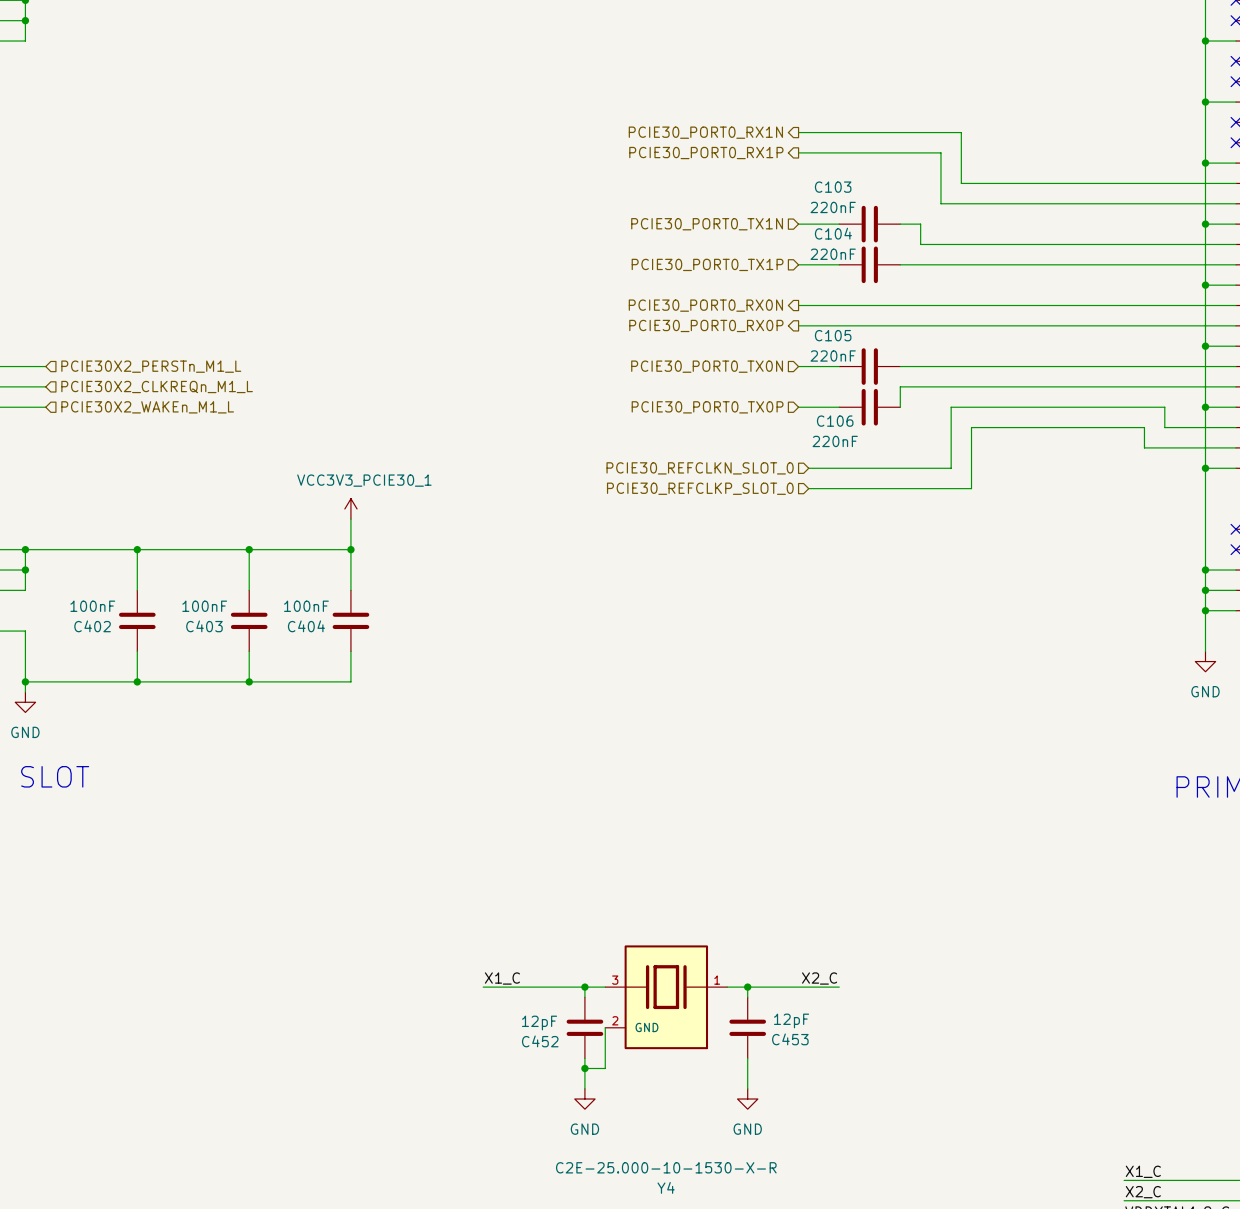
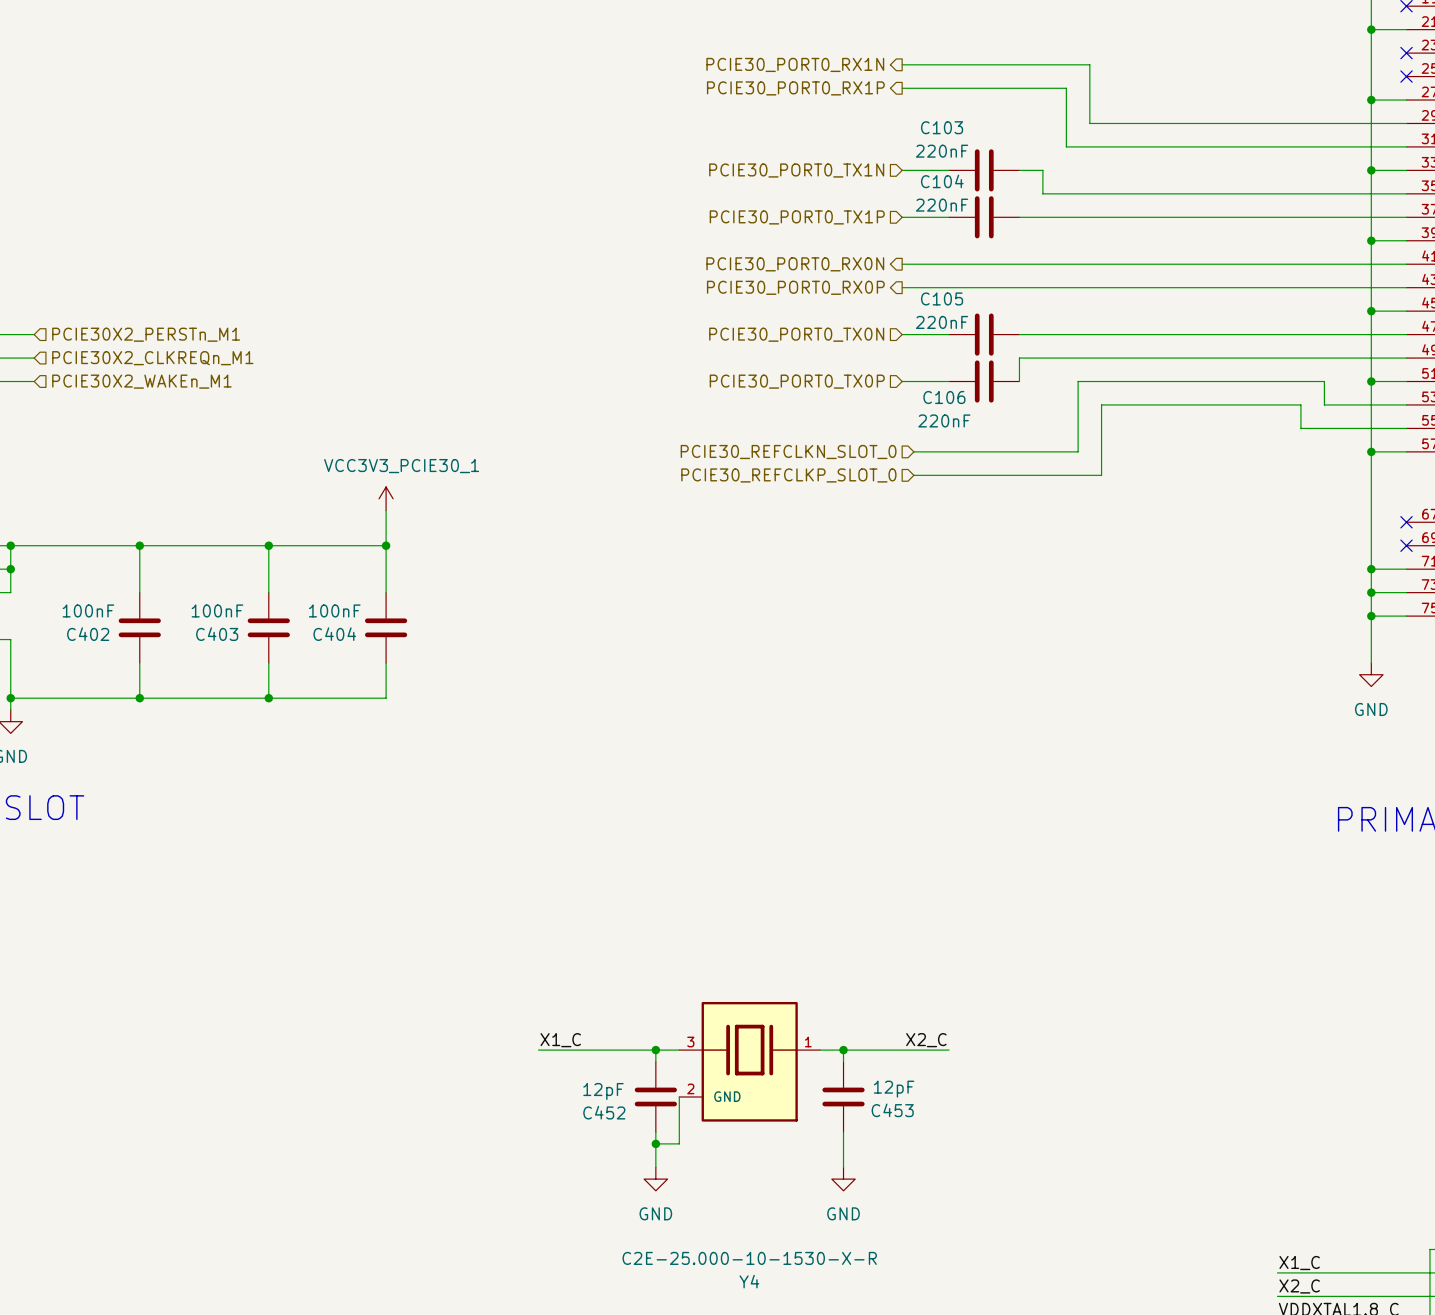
hierarchical label: PCIE30X2_PERSTn_M1_L (151, 366) -> PCIE30X2_PERSTn_M1 (146, 334)
hierarchical label: PCIE30X2_CLKREQn_M1_L (157, 387) -> PCIE30X2_CLKREQn_M1 (152, 358)
hierarchical label: PCIE30X2_WAKEn_M1_L (147, 407) -> PCIE30X2_WAKEn_M1 (141, 381)

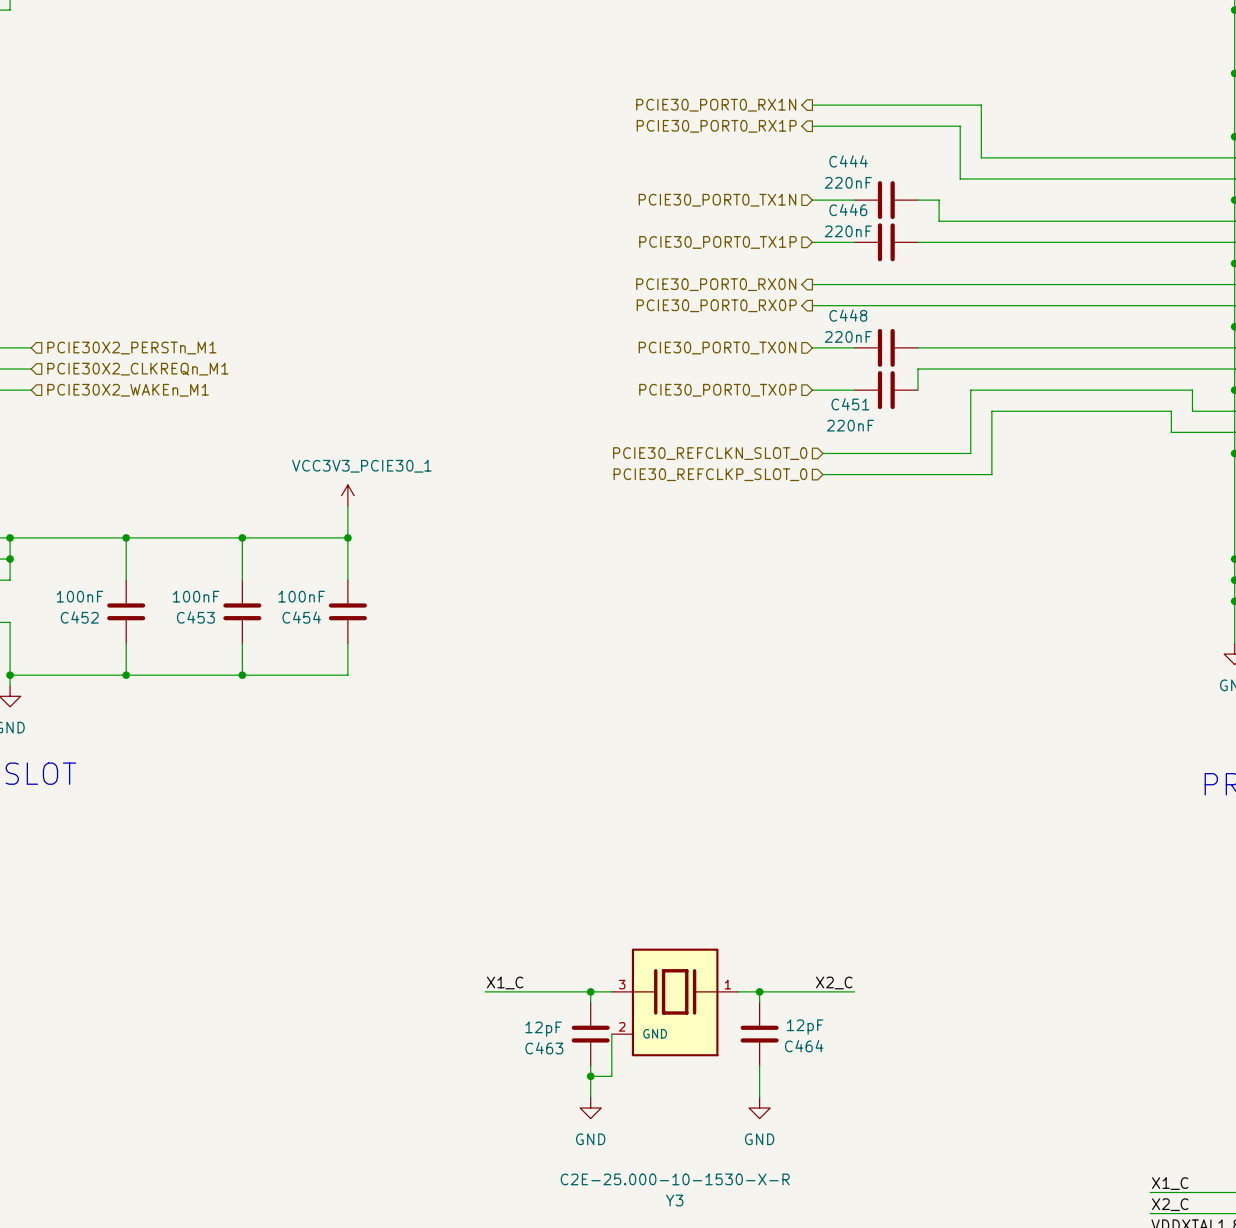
C103 name: C103 (942, 127) -> C444 (848, 161)
C104 name: C104 (942, 181) -> C446 (848, 210)
C105 name: C105 (942, 298) -> C448 (848, 315)
C106 name: C106 (944, 397) -> C451 (850, 404)
C402 name: C402 (88, 634) -> C452 (79, 617)
C403 name: C403 (217, 634) -> C453 (195, 617)
C404 name: C404 (334, 634) -> C454 (301, 617)
C453 name: C453 (892, 1110) -> C464 (804, 1046)
C452 name: C452 (604, 1112) -> C463 (544, 1048)
Y4 name: Y4 (749, 1281) -> Y3 (674, 1200)

